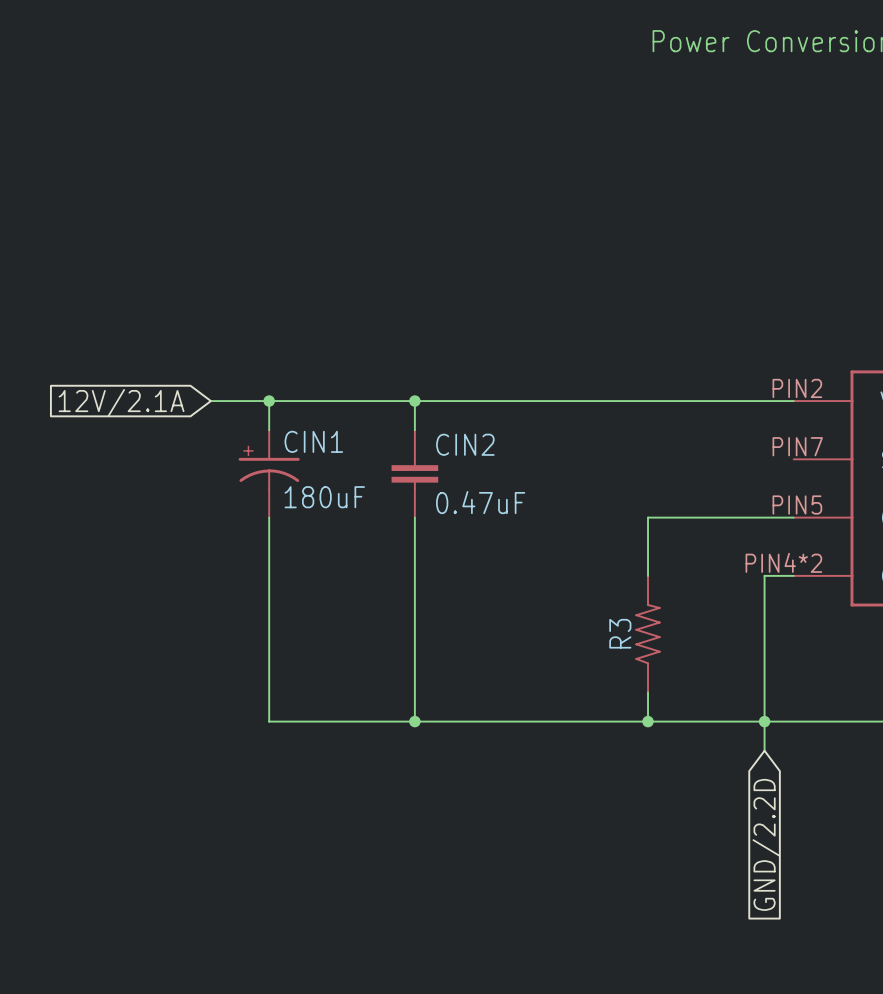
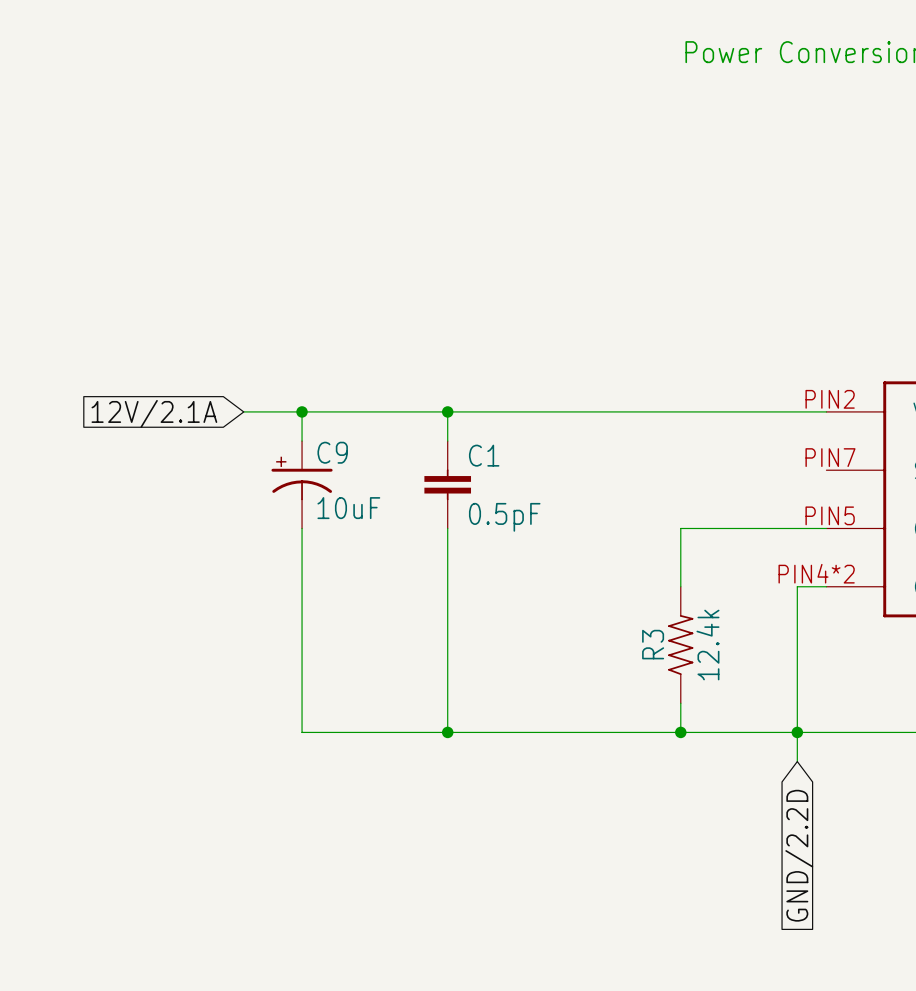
CIN1 name: CIN1 (313, 441) -> C9 (332, 452)
CIN2 name: CIN2 (465, 444) -> C1 (484, 455)
CIN1 value: 180uF (324, 497) -> 10uF (348, 508)
CIN2 value: 0.47uF (480, 502) -> 0.5pF (504, 517)
R3 value: none -> 12.4k (707, 645)

